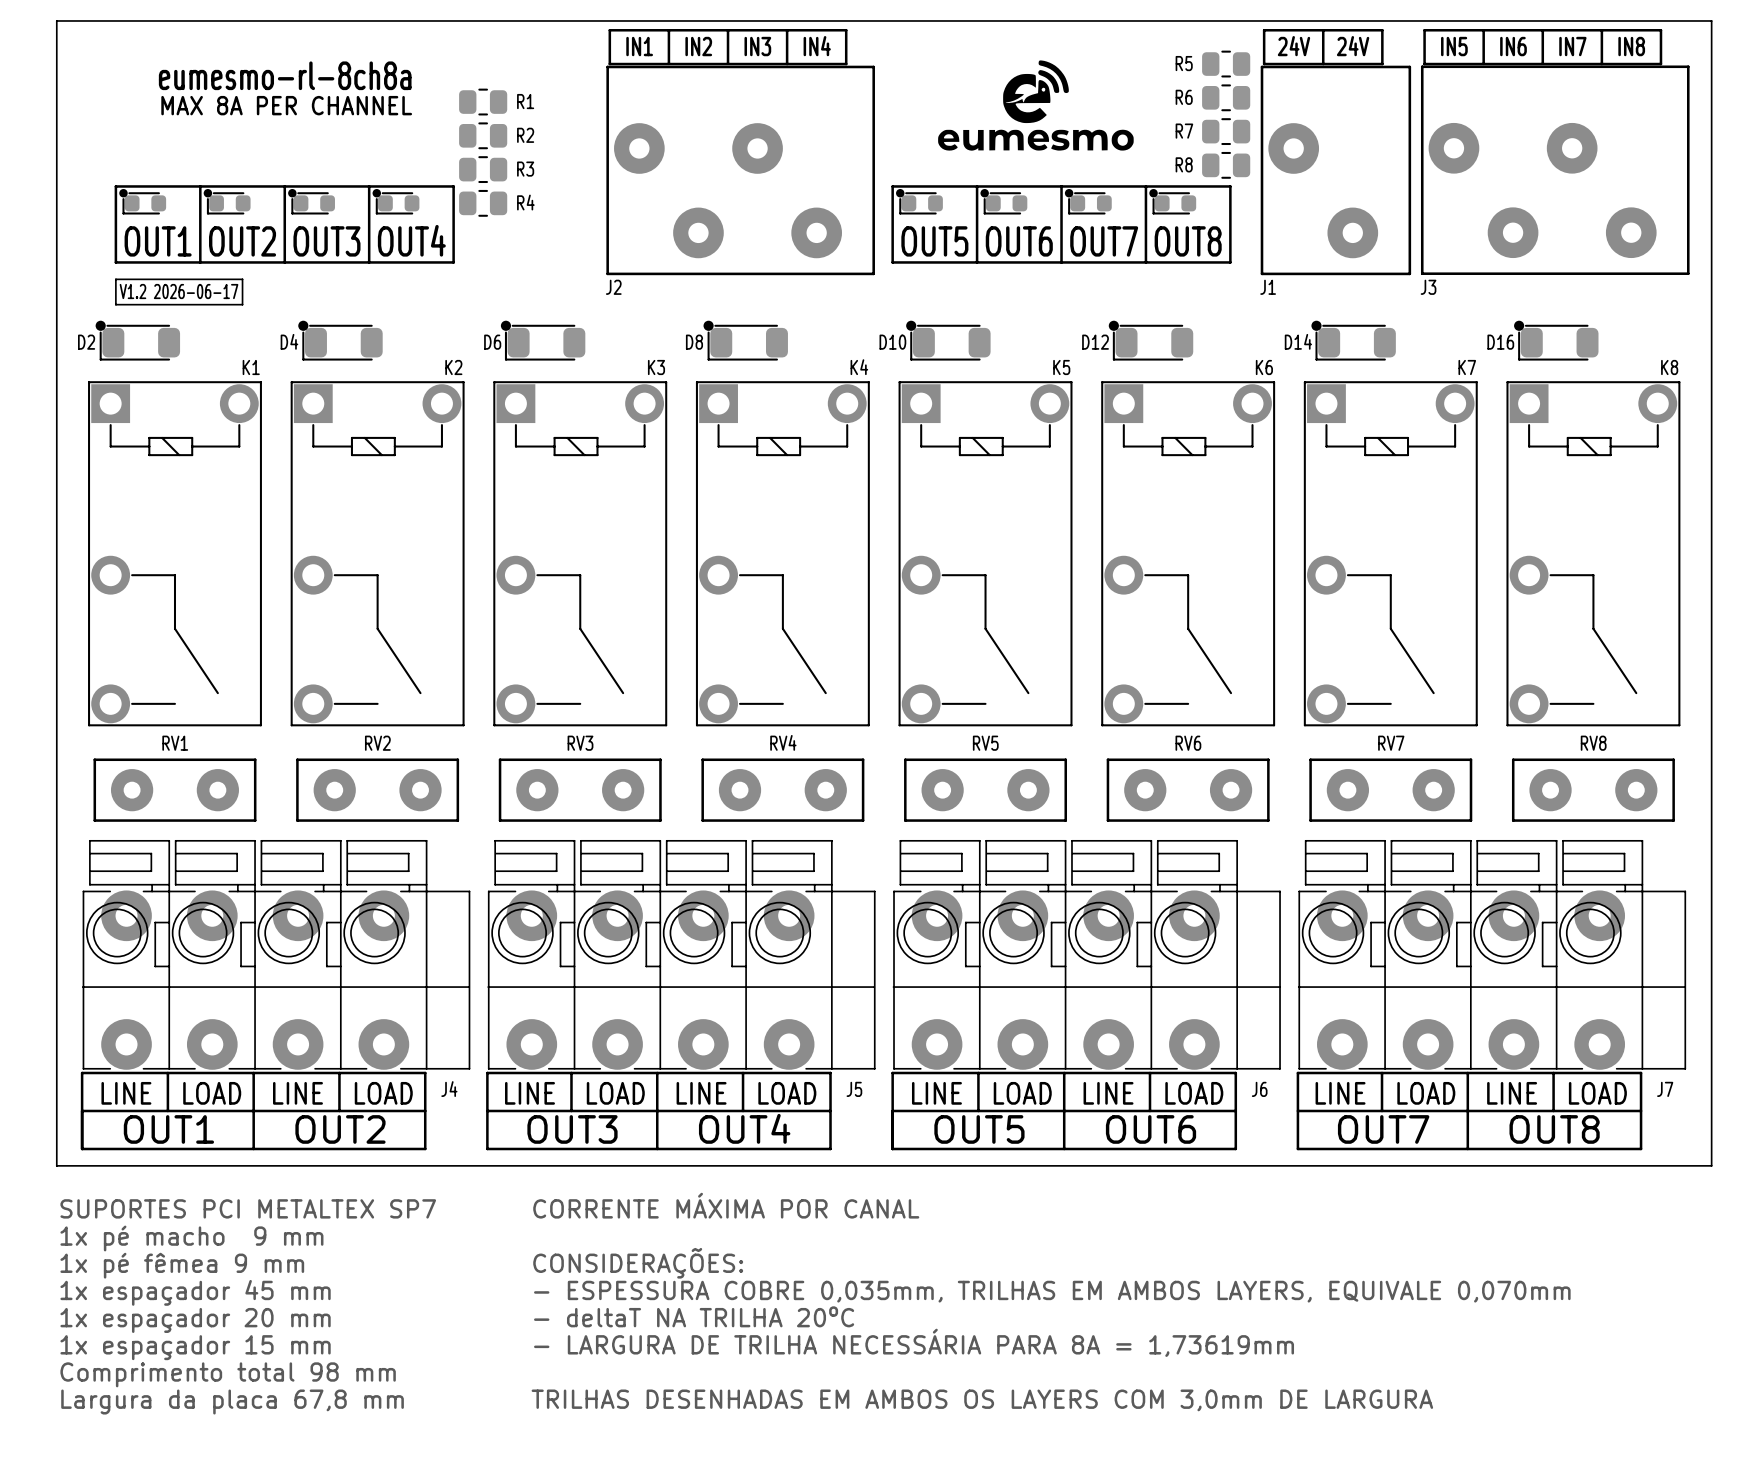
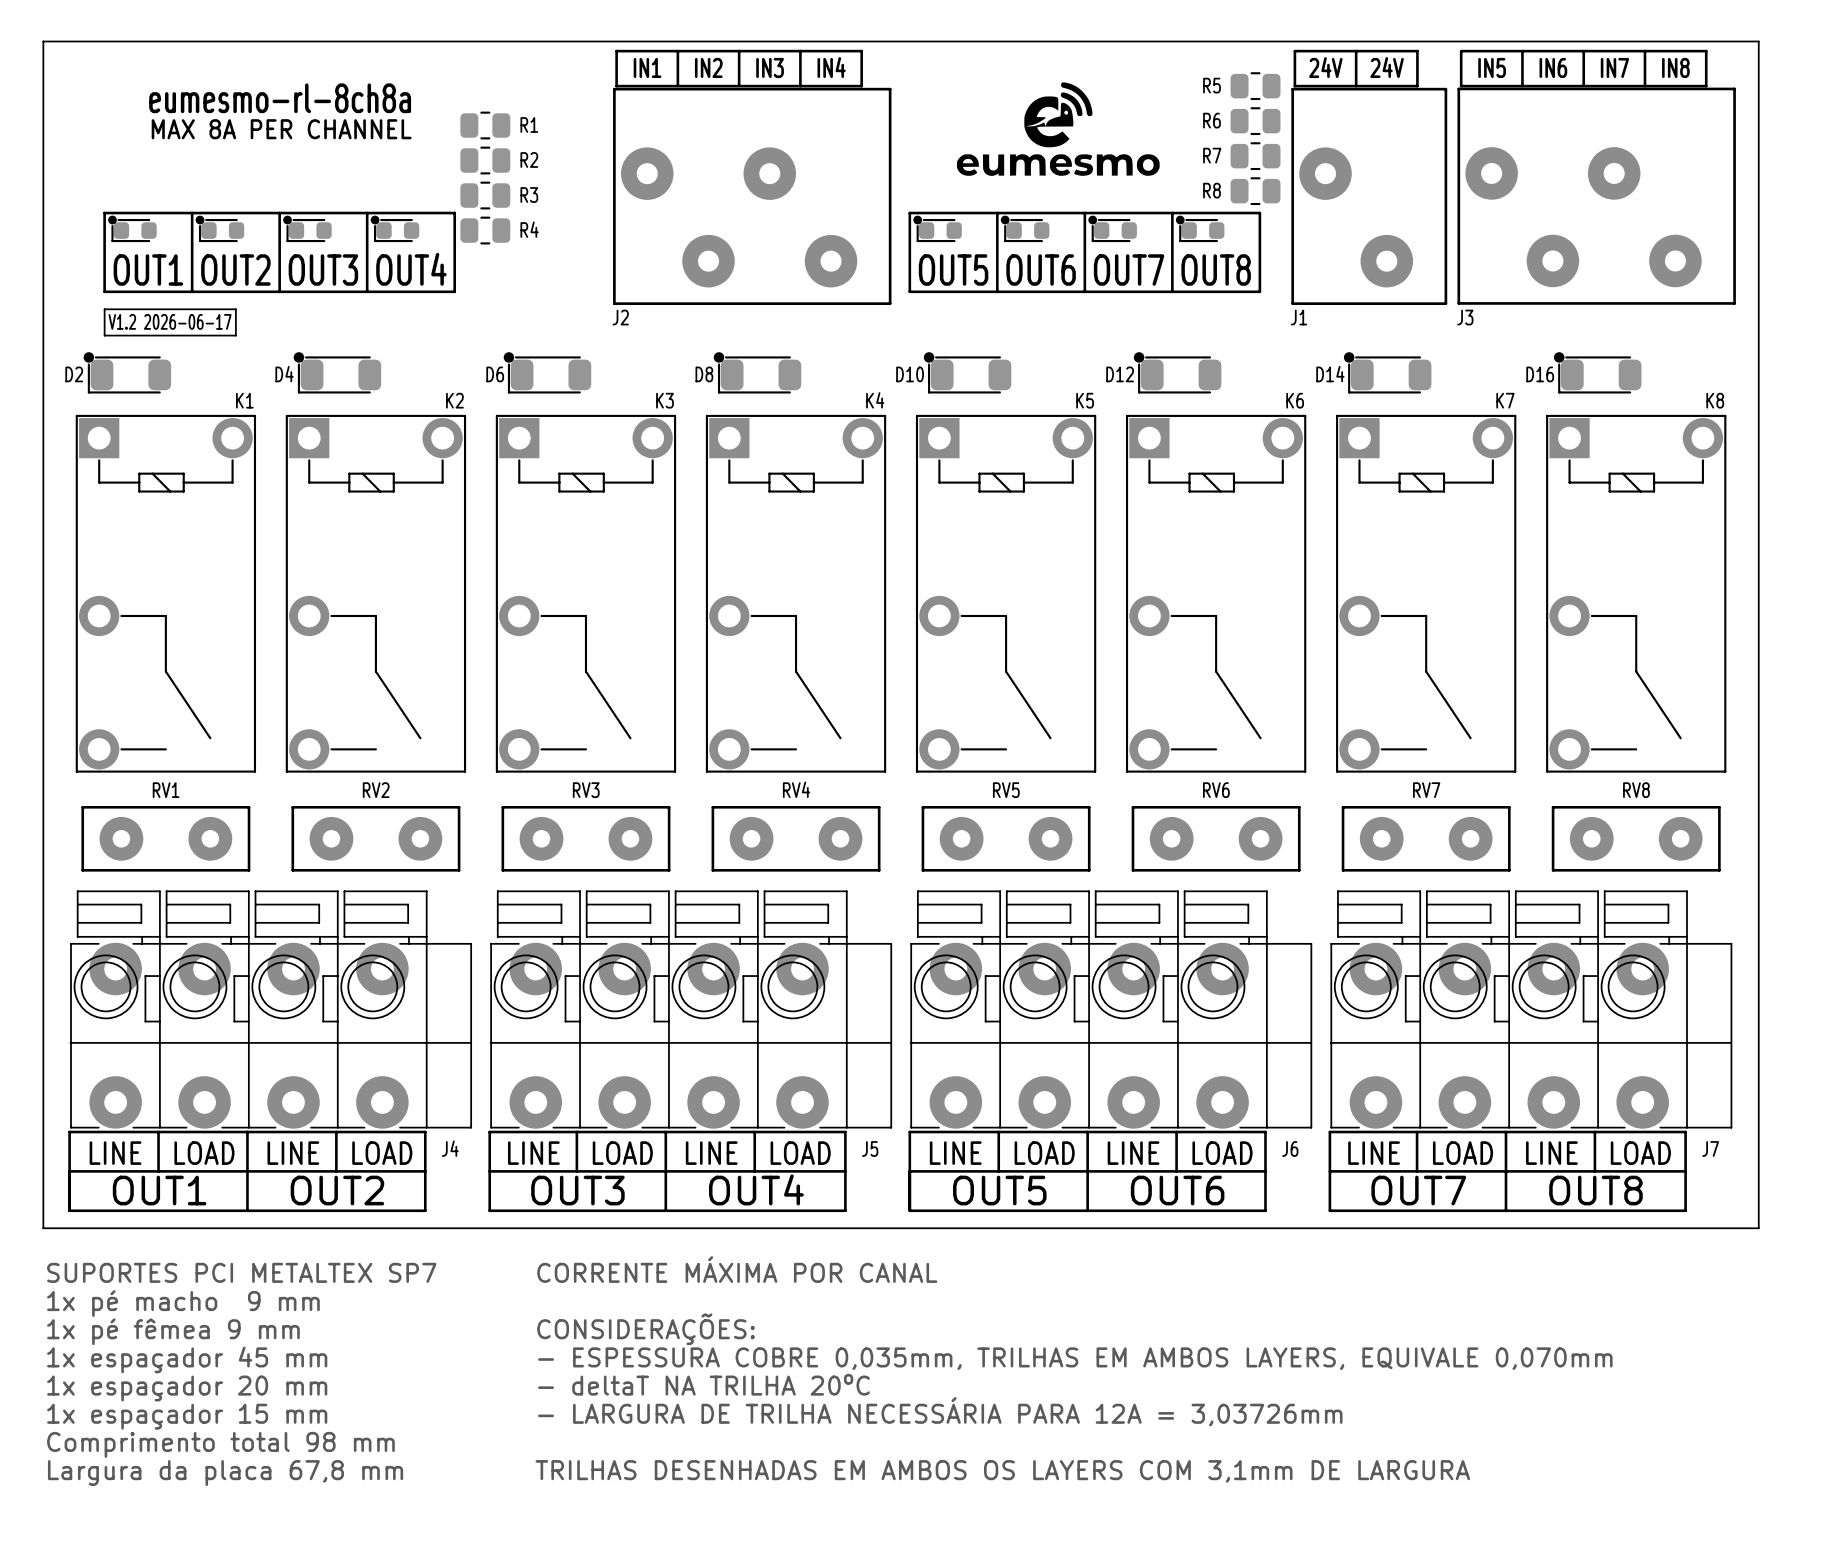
text: - LARGURA DE TRILHA NECESSÁRIA PARA 8A = 1,73619mm (914, 1342) -> - LARGURA DE TRILHA NECESSÁRIA PARA 12A = 3,03726mm (940, 1411)
text: TRILHAS DESENHADAS EM AMBOS OS LAYERS COM 3,0mm DE LARGURA (982, 1400) -> TRILHAS DESENHADAS EM AMBOS OS LAYERS COM 3,1mm DE LARGURA (1002, 1471)

